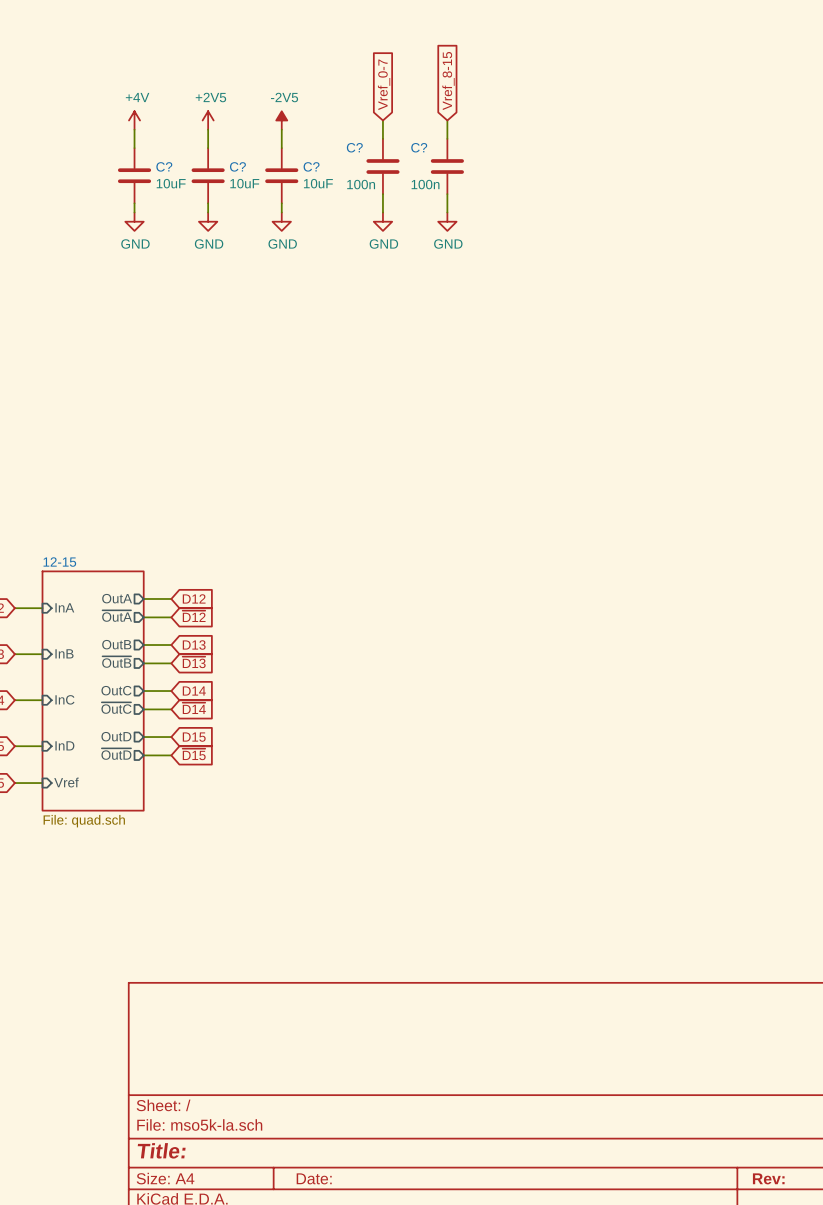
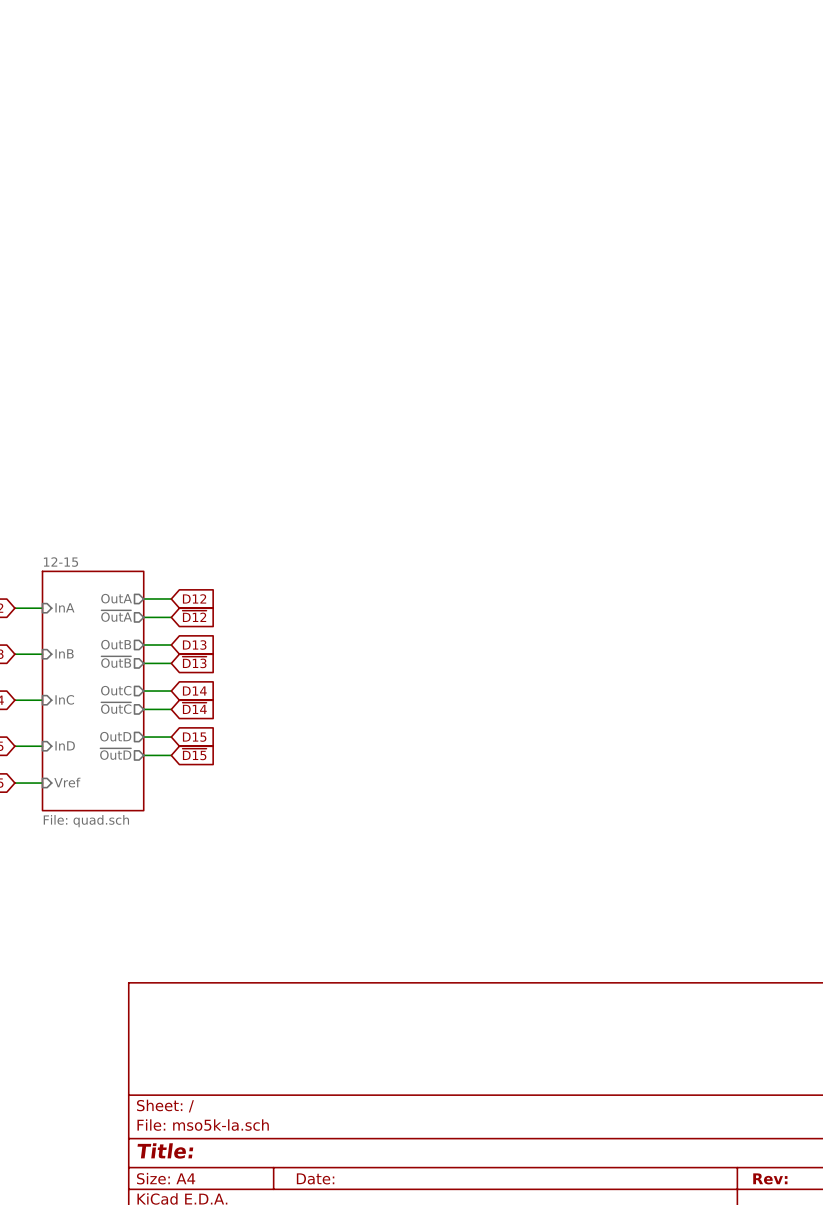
global label: Vref_8-15 (448, 81) -> none
global label: Vref_0-7 (384, 84) -> none
power symbol: +4V (134, 120) -> none
power symbol: +2V5 (208, 120) -> none
power symbol: -2V5 (281, 120) -> none
wire: (382, 120) (382, 138) -> none
wire: (447, 120) (447, 138) -> none
wire: (134, 129) (134, 148) -> none
wire: (208, 129) (208, 148) -> none
wire: (281, 129) (281, 148) -> none
C?: 100n (382, 166) -> none
C?: 100n (447, 166) -> none
C?: 10uF (134, 175) -> none
C?: 10uF (208, 175) -> none
C?: 10uF (281, 175) -> none
wire: (382, 194) (382, 212) -> none
wire: (447, 194) (447, 212) -> none
wire: (134, 203) (134, 212) -> none
wire: (208, 203) (208, 212) -> none
wire: (281, 203) (281, 212) -> none
power symbol: GND (134, 221) -> none
power symbol: GND (208, 221) -> none
power symbol: GND (281, 221) -> none
power symbol: GND (382, 221) -> none
power symbol: GND (447, 221) -> none

